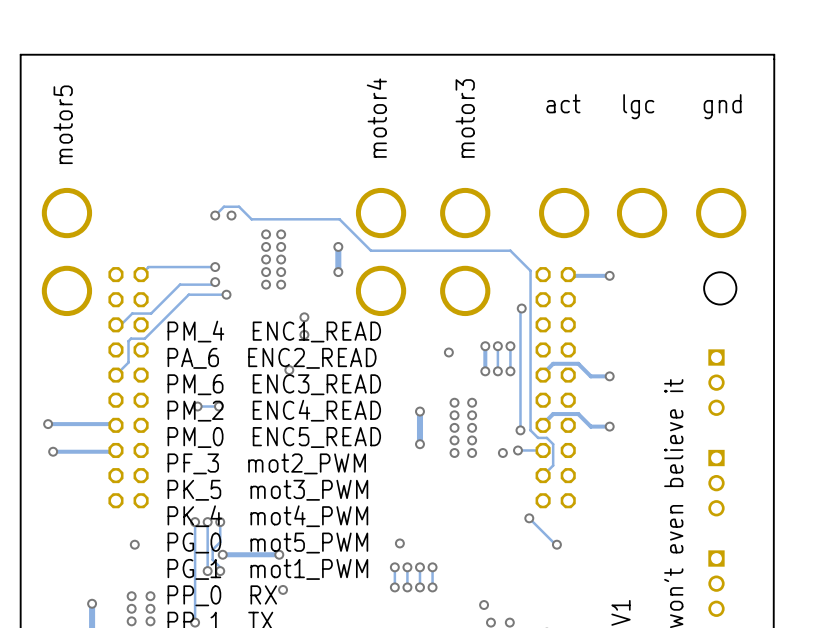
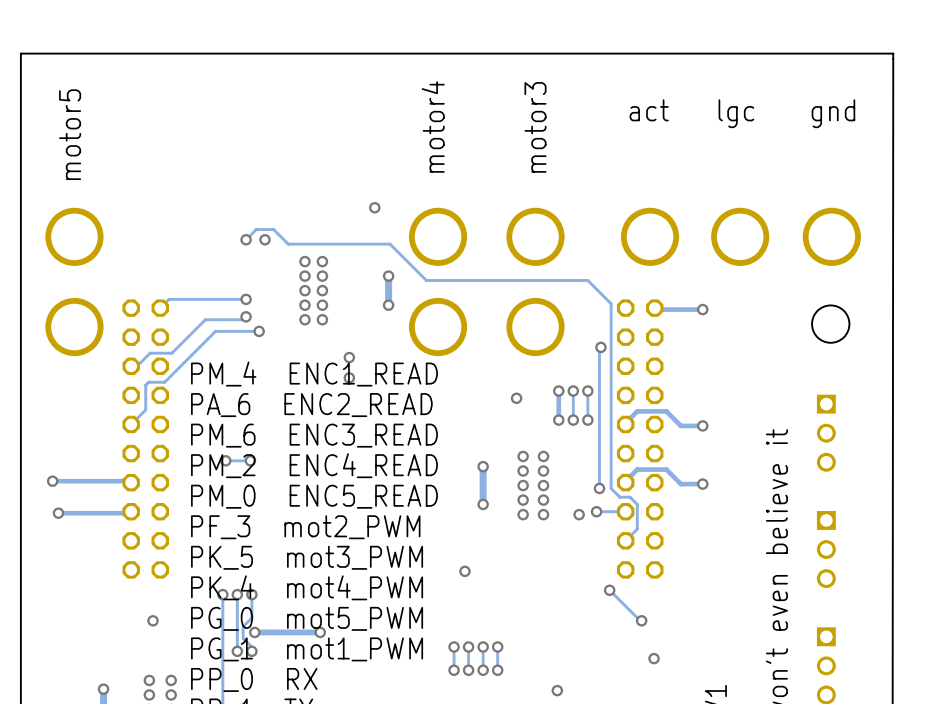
via: none -> (374, 207)
via: (289, 370) -> none
via position: (399, 543) -> (464, 571)
via: none -> (654, 658)
via: (283, 589) -> none

